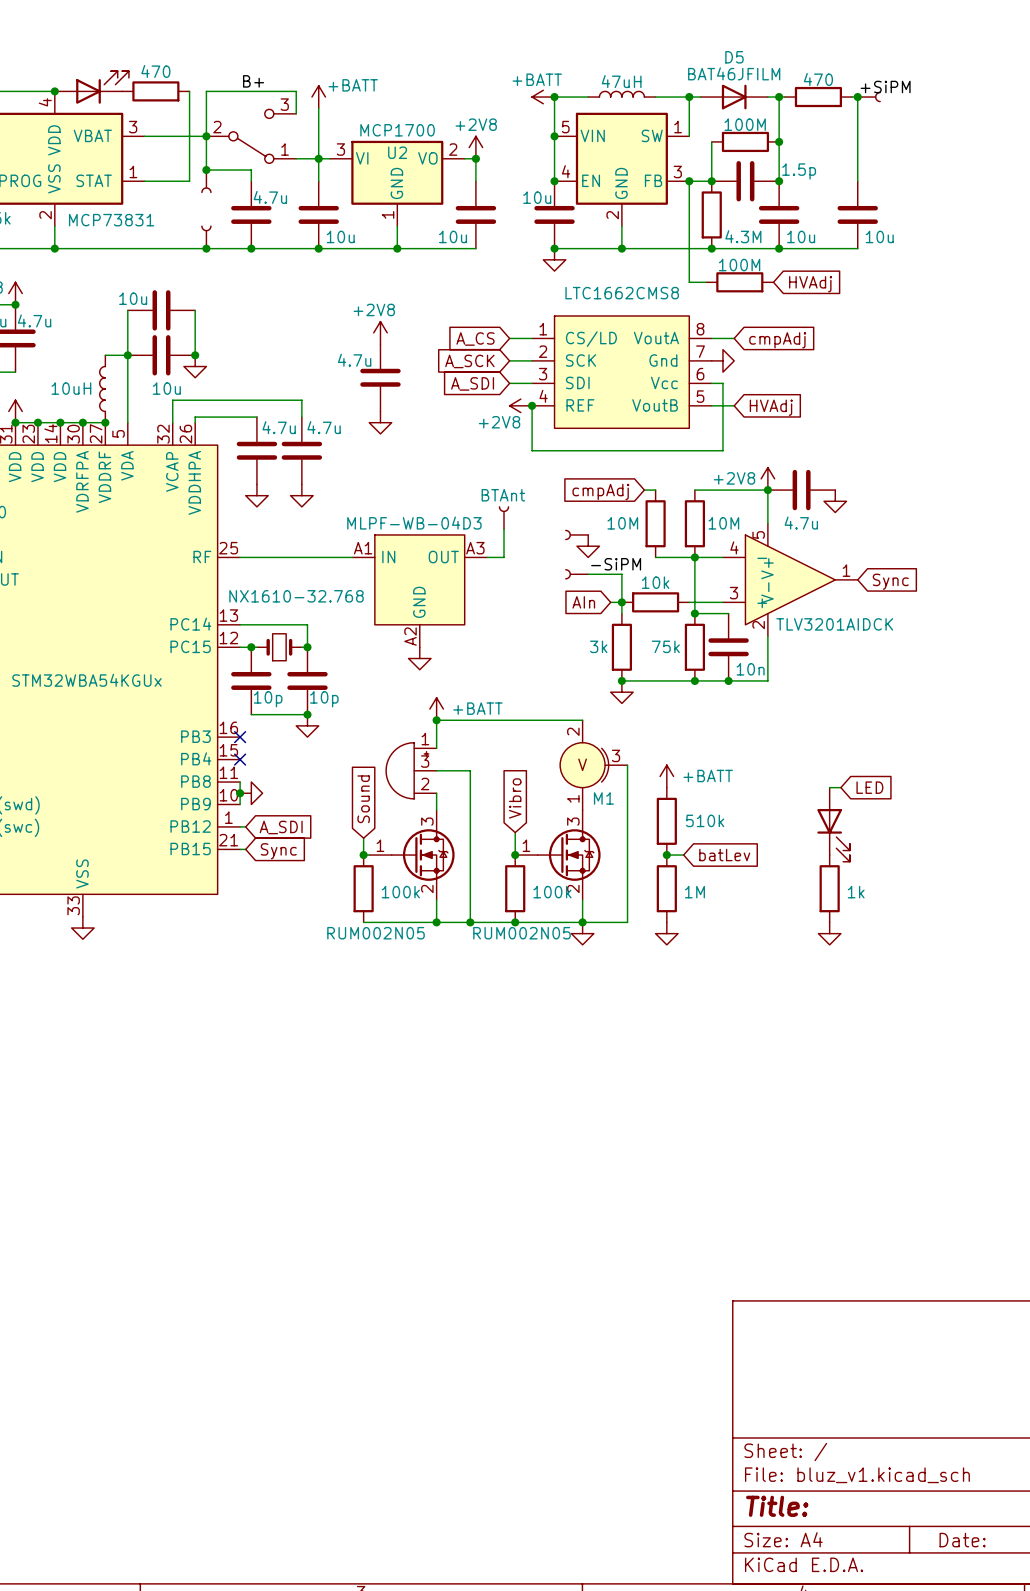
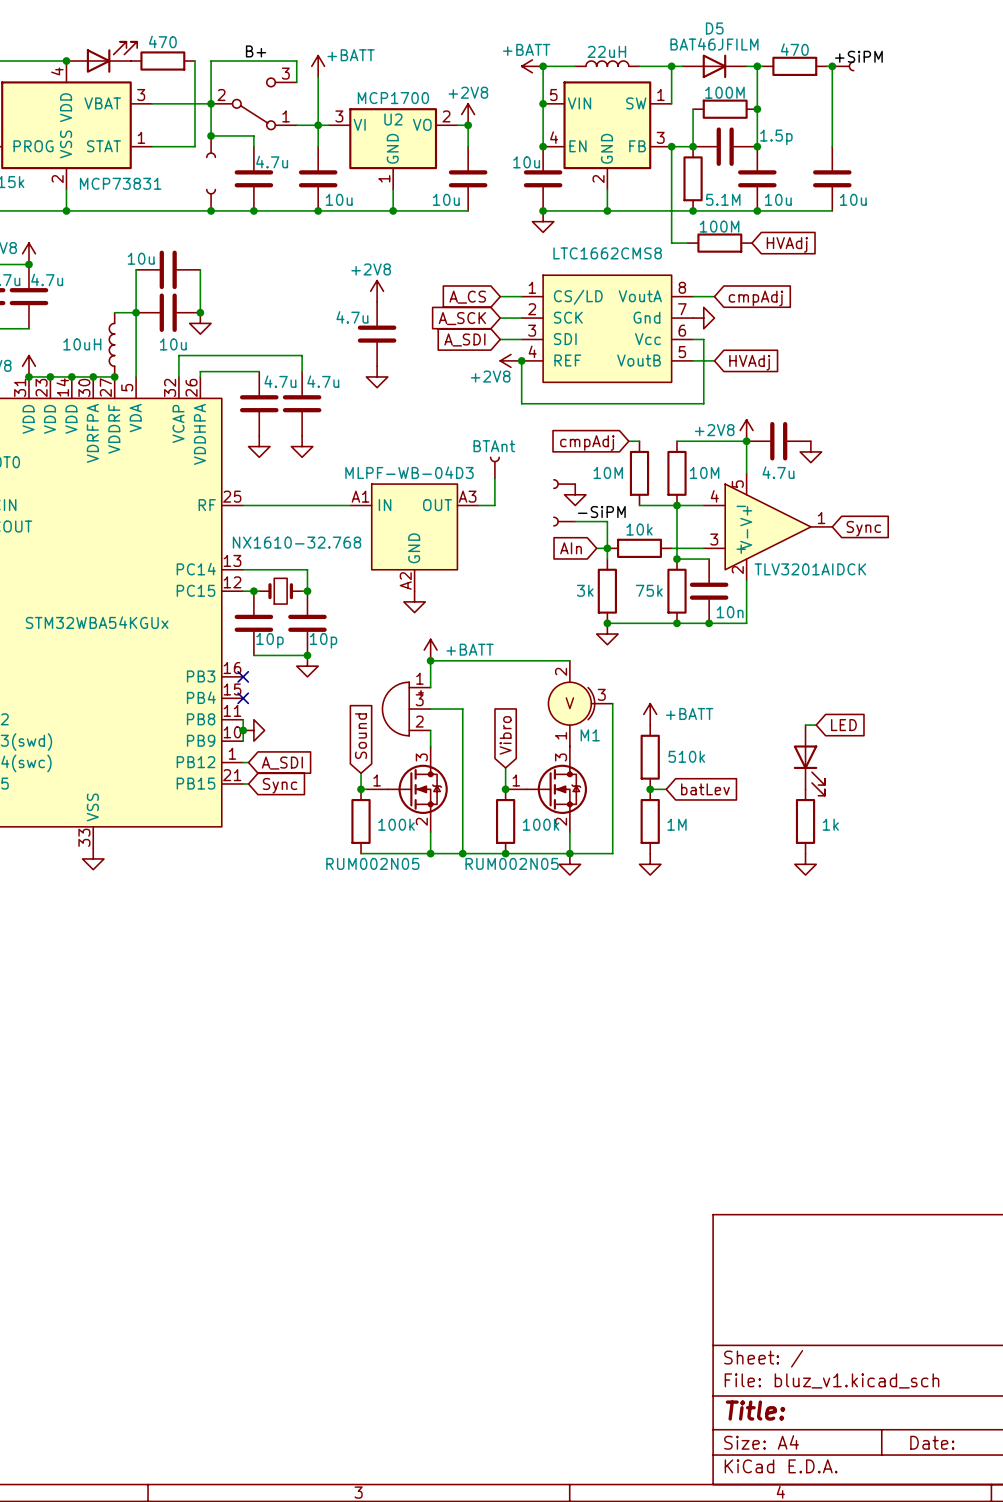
part value: 47uH (621, 81) -> 22uH (606, 51)
part value: 4.3M (743, 236) -> 5.1M (723, 199)

